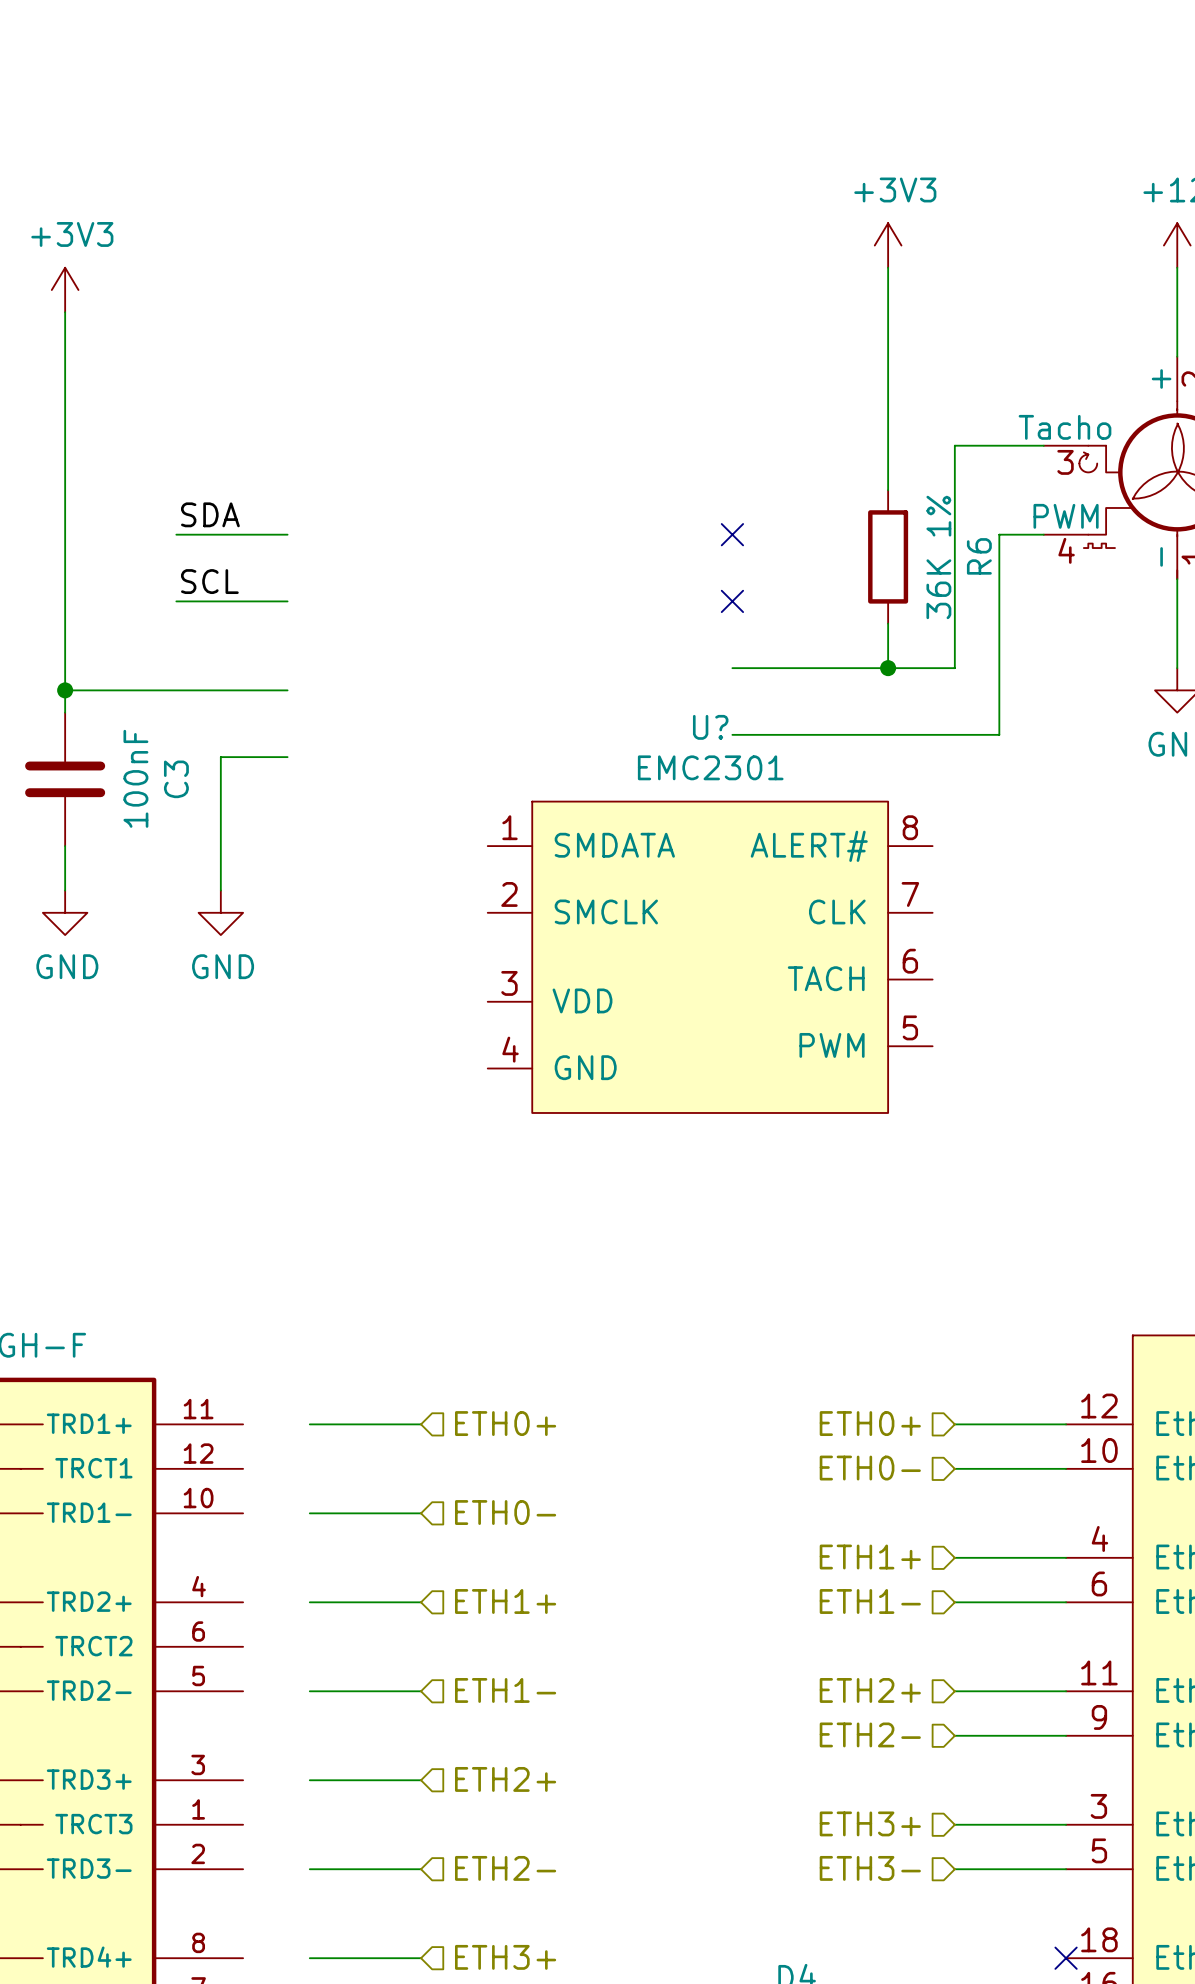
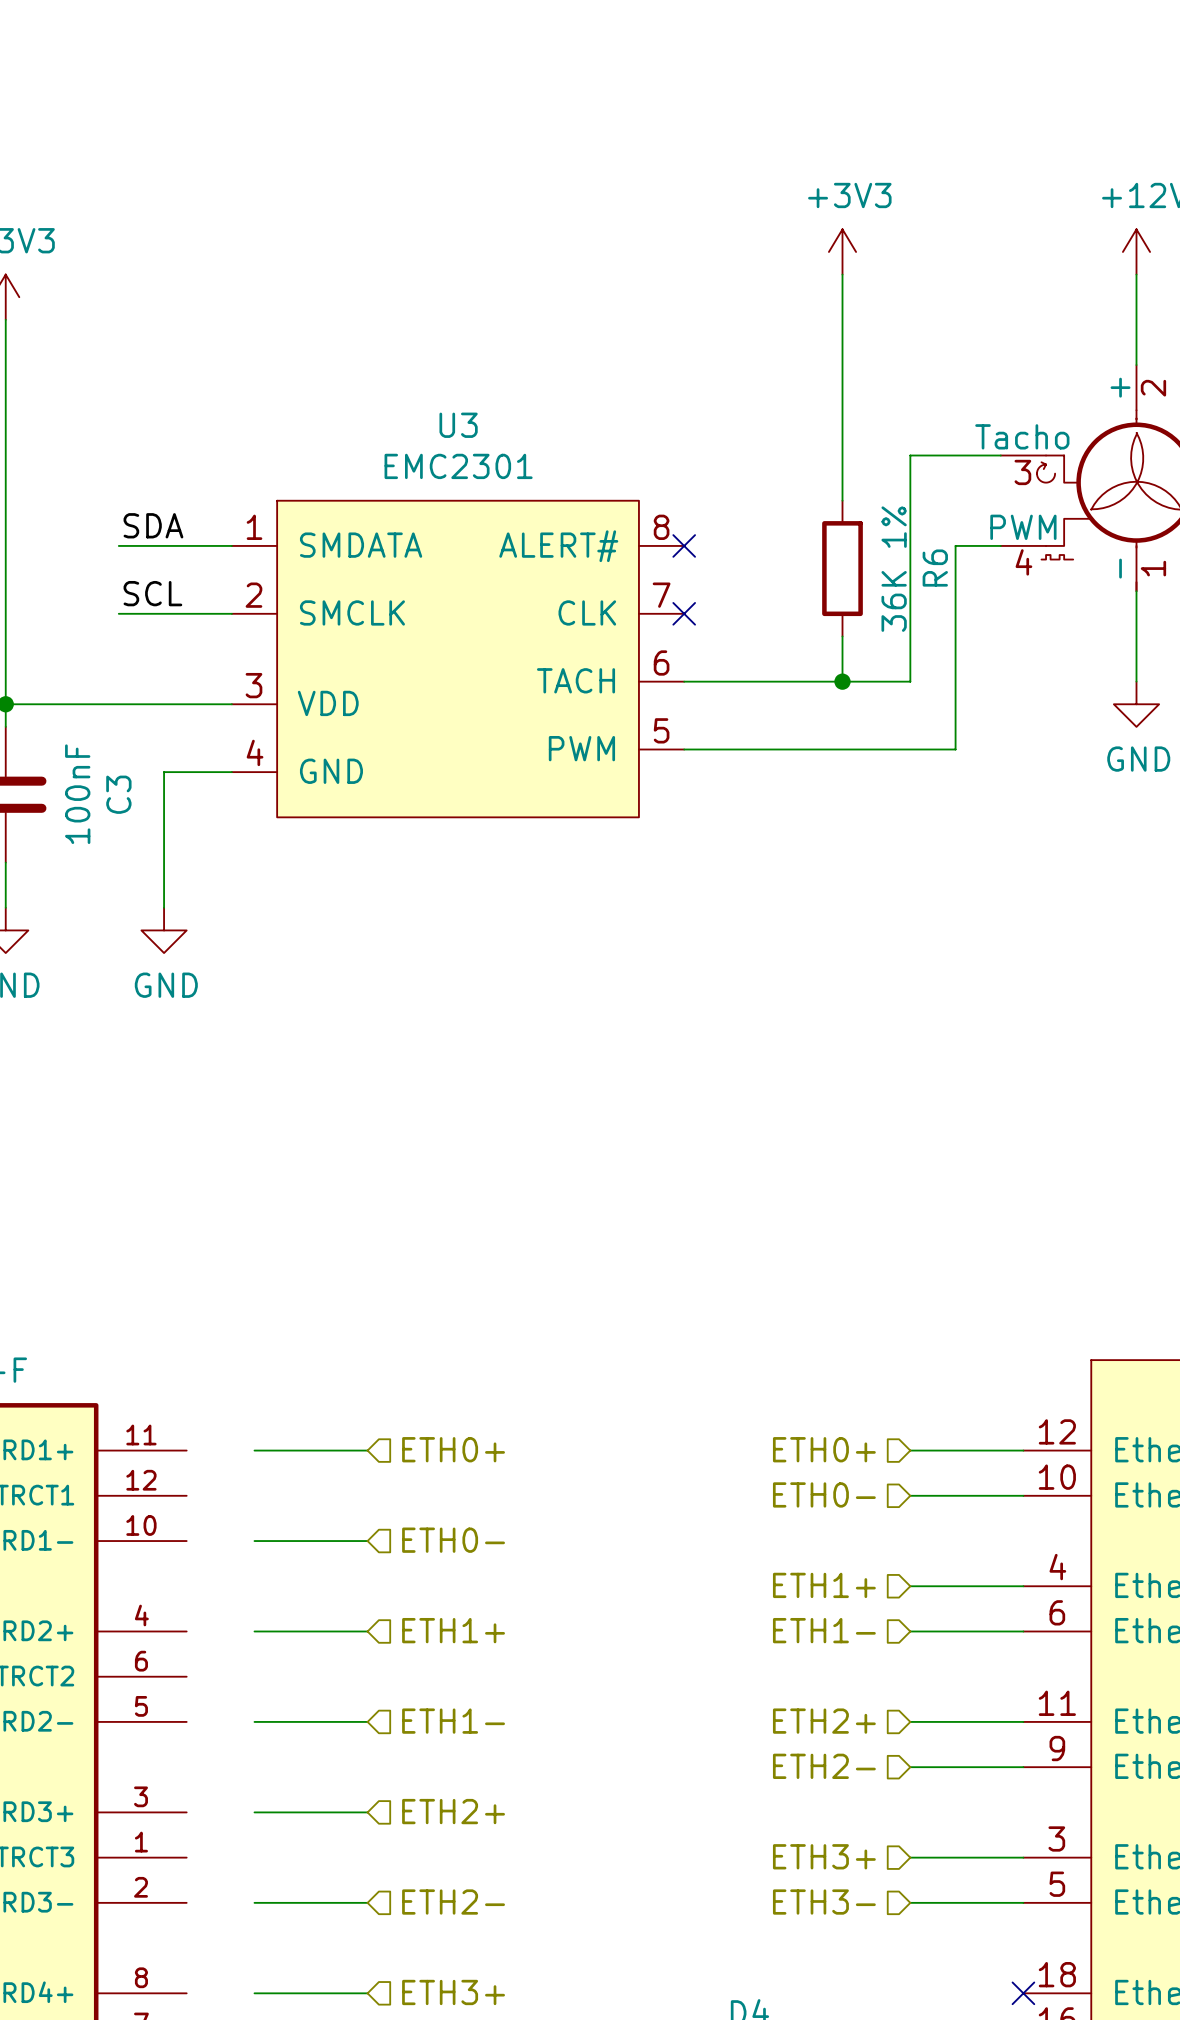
U3: none -> EMC2301 (458, 659)
U?: EMC2301 (710, 957) -> none

